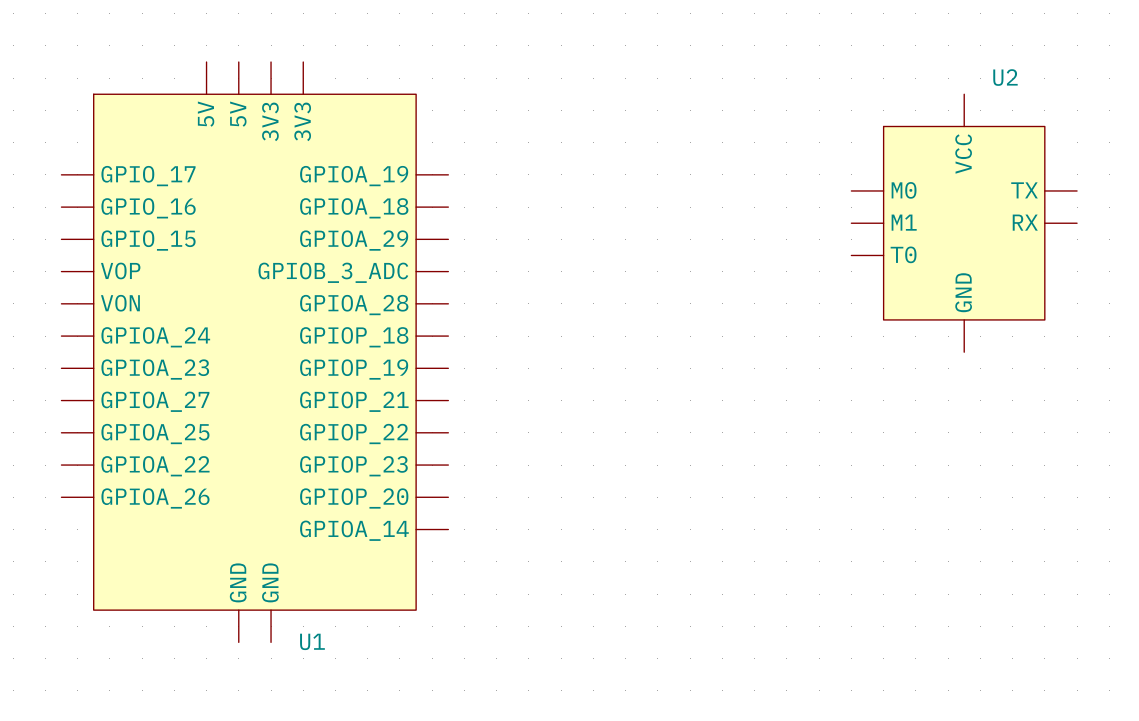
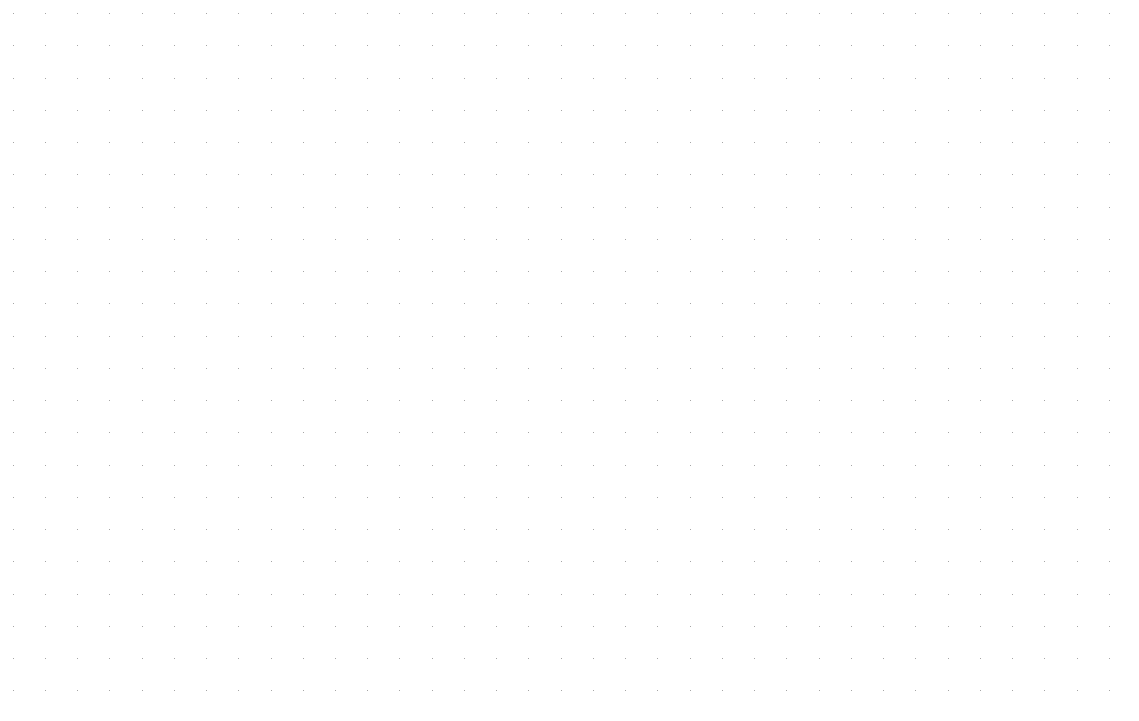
U2: (964, 223) -> none
U1: (254, 352) -> none

